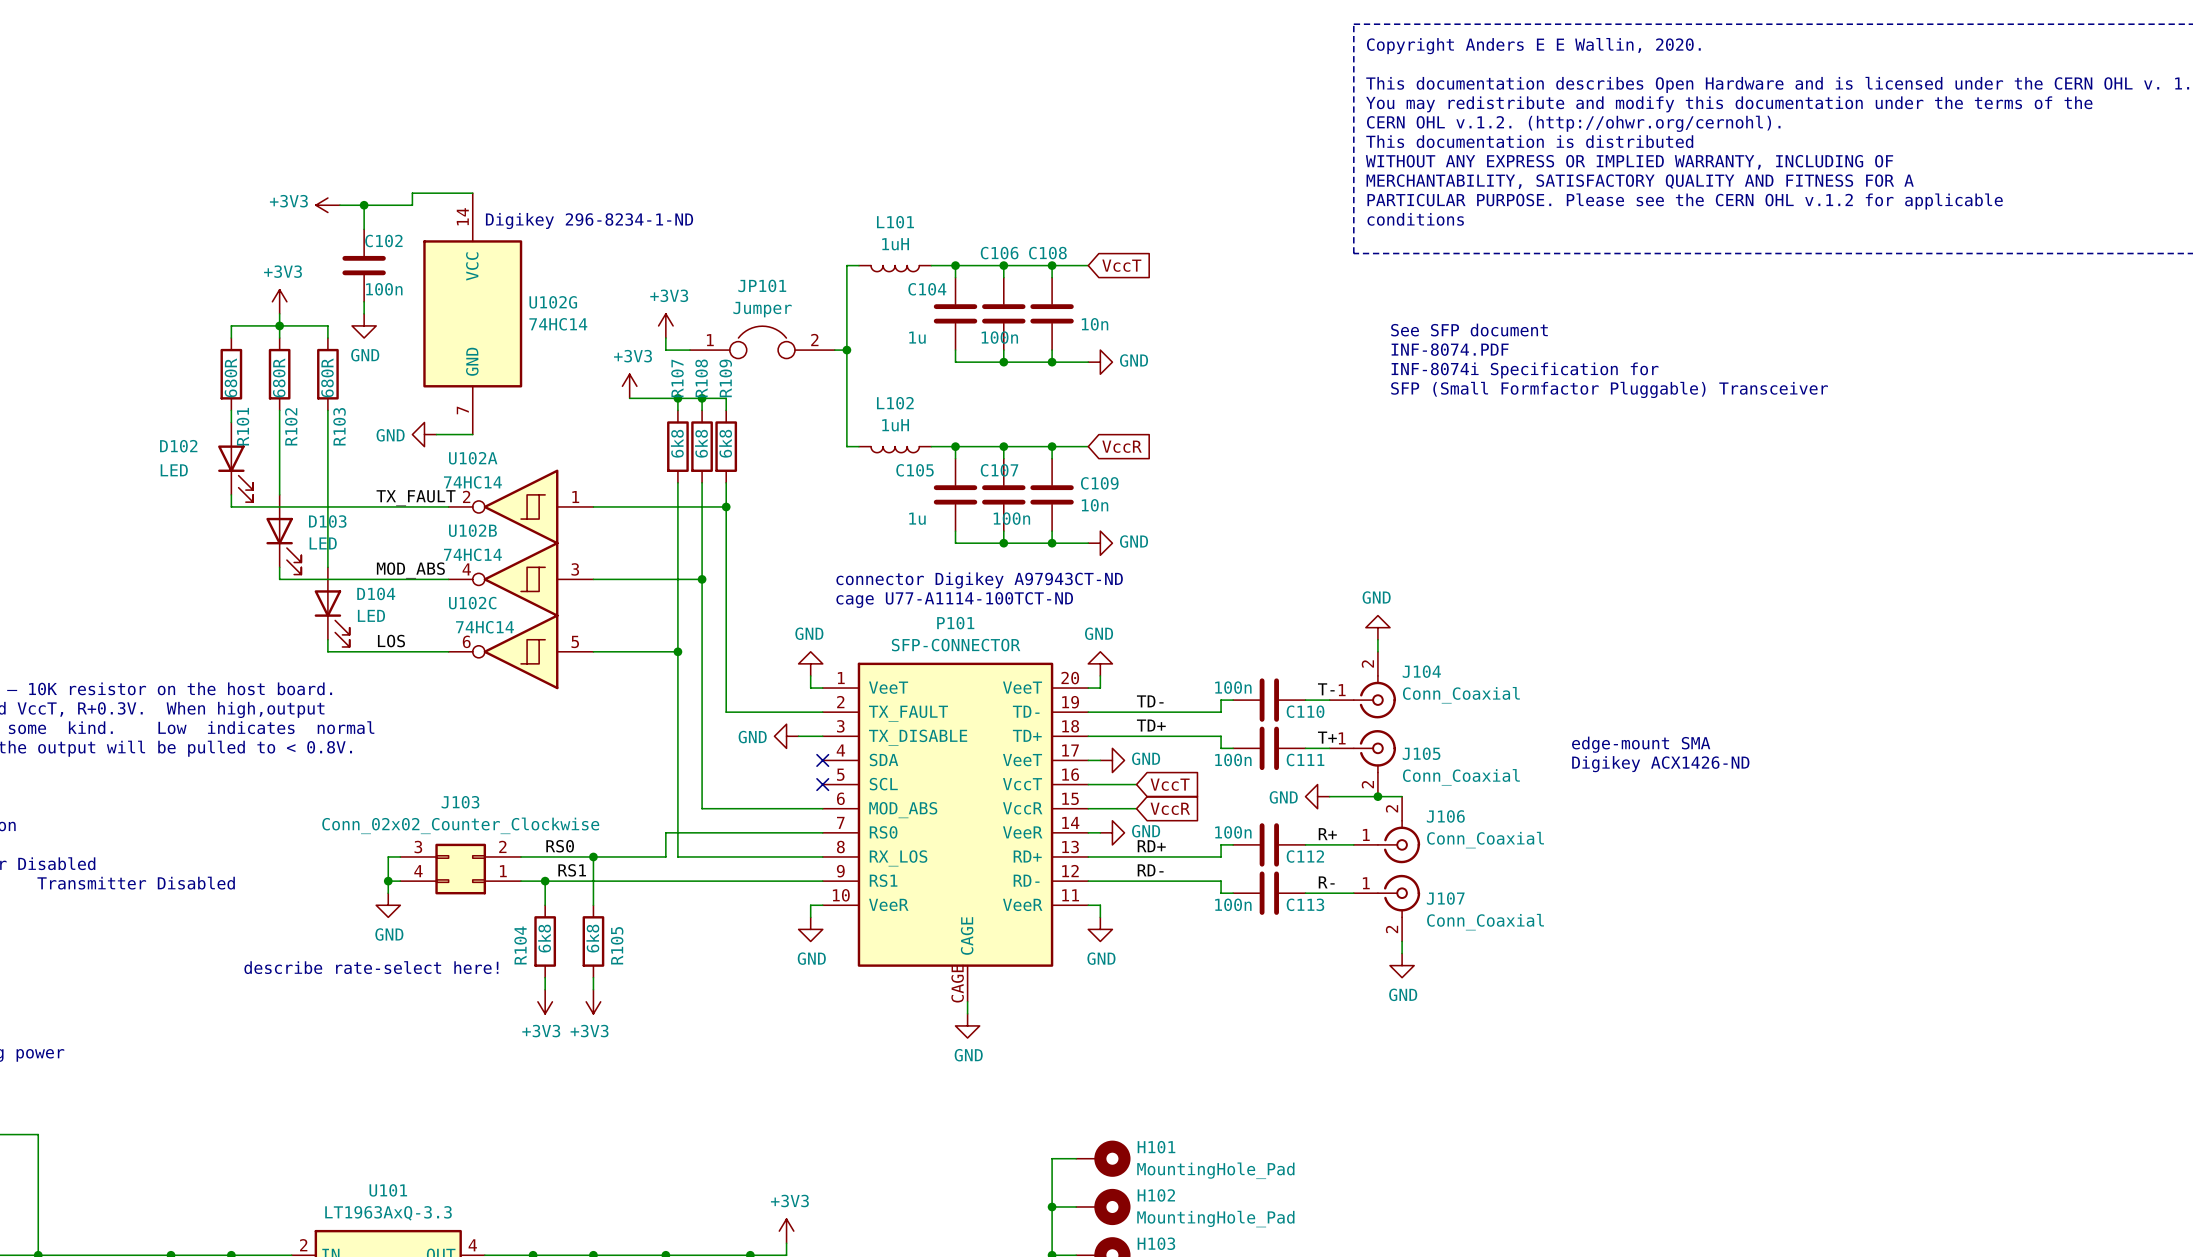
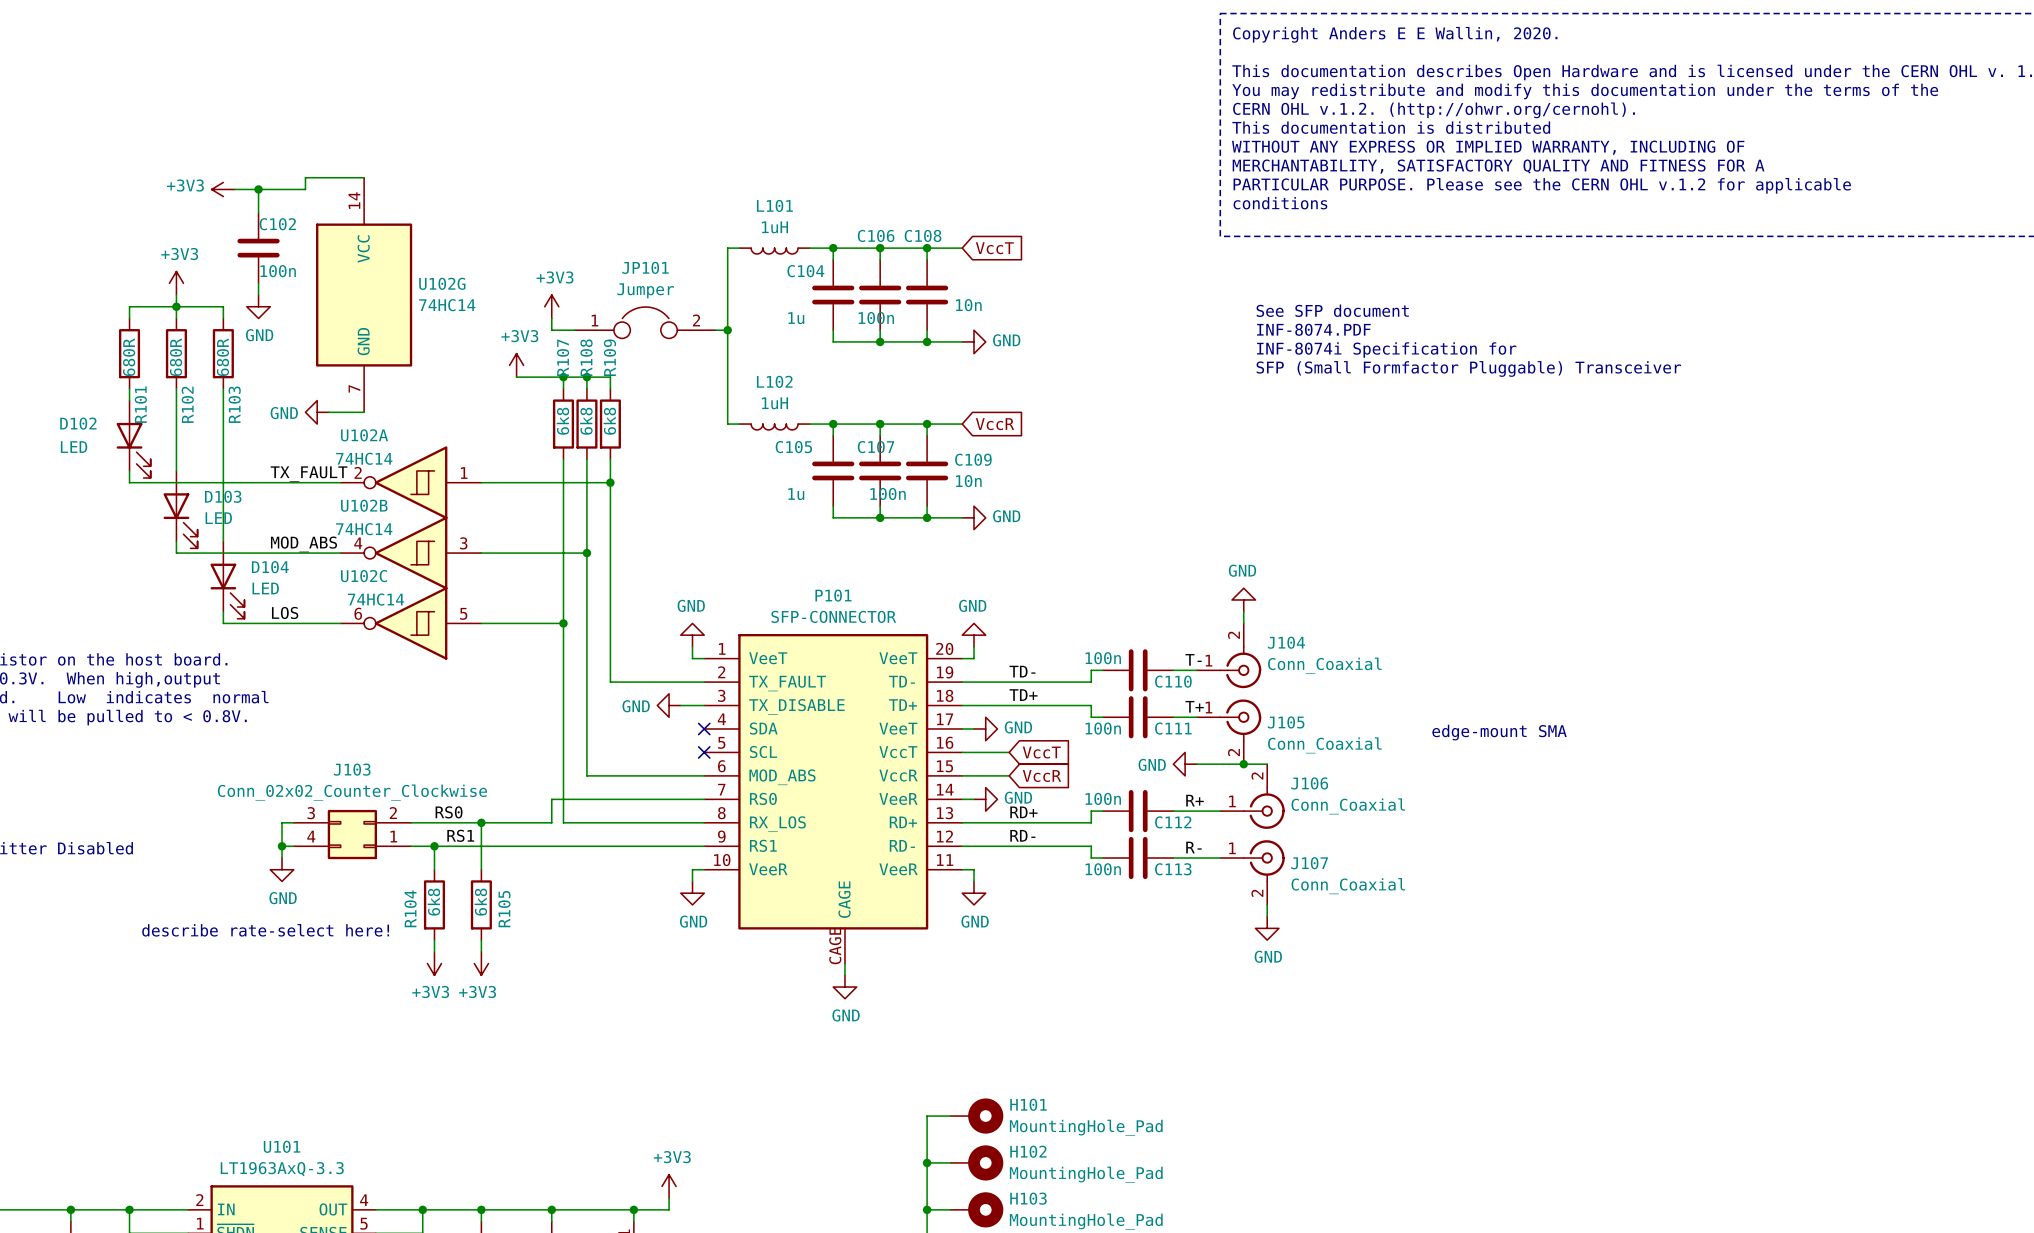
text: Digikey 296-8234-1-ND (589, 221) -> none
text: connector Digikey A97943CT-ND (979, 580) -> none
text: cage U77-A1114-100TCT-ND (954, 600) -> none
text: edge-mount SMA (1641, 744) -> none
text: Digikey ACX1426-ND (1660, 764) -> edge-mount SMA (1499, 732)

